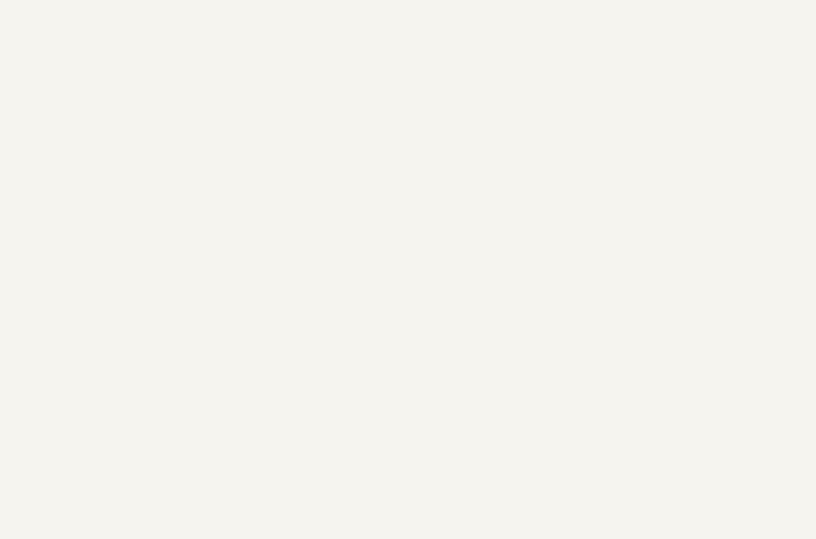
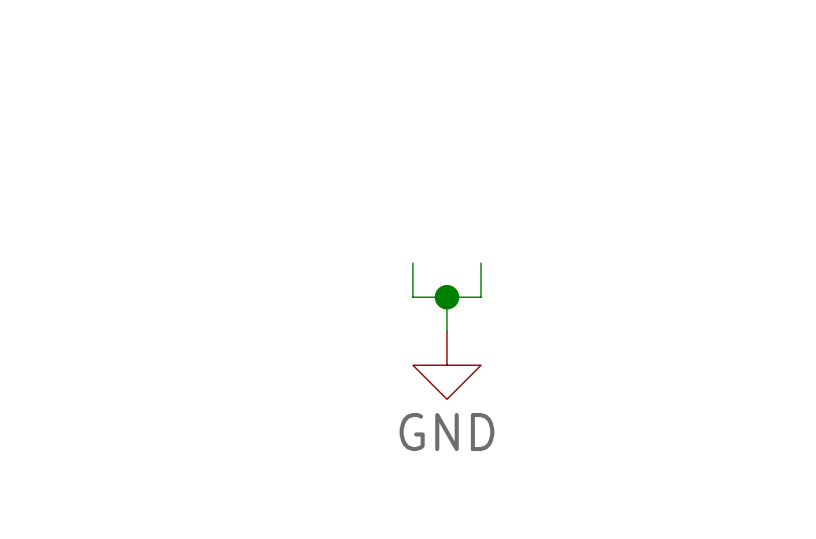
wire: none -> (412, 263) (412, 297) (480, 297) (480, 263)
wire: none -> (446, 297) (446, 331)
junction: none -> (446, 297)
power symbol: none -> GND (446, 365)

